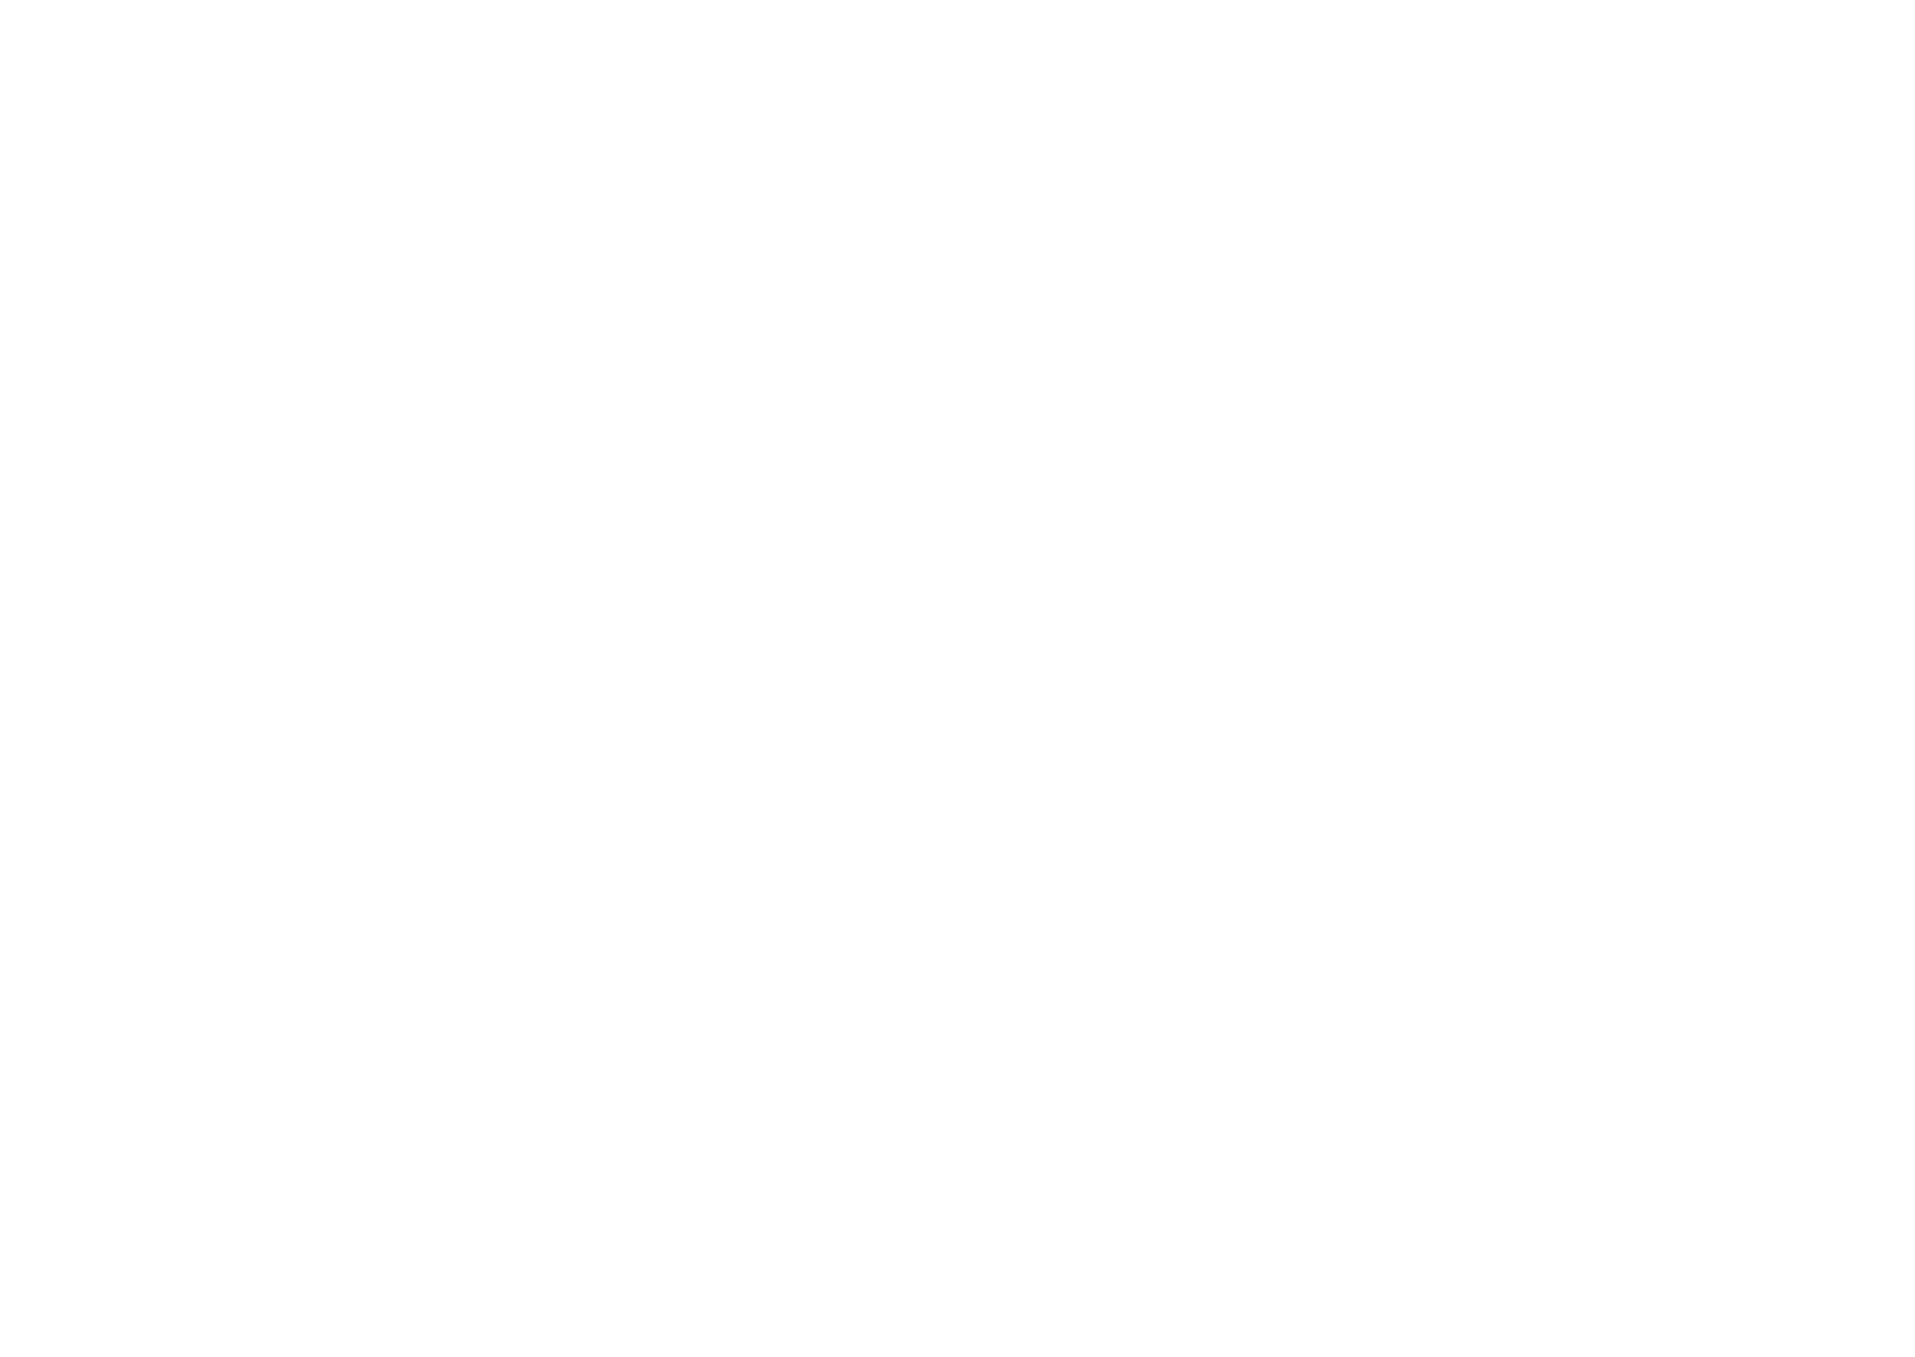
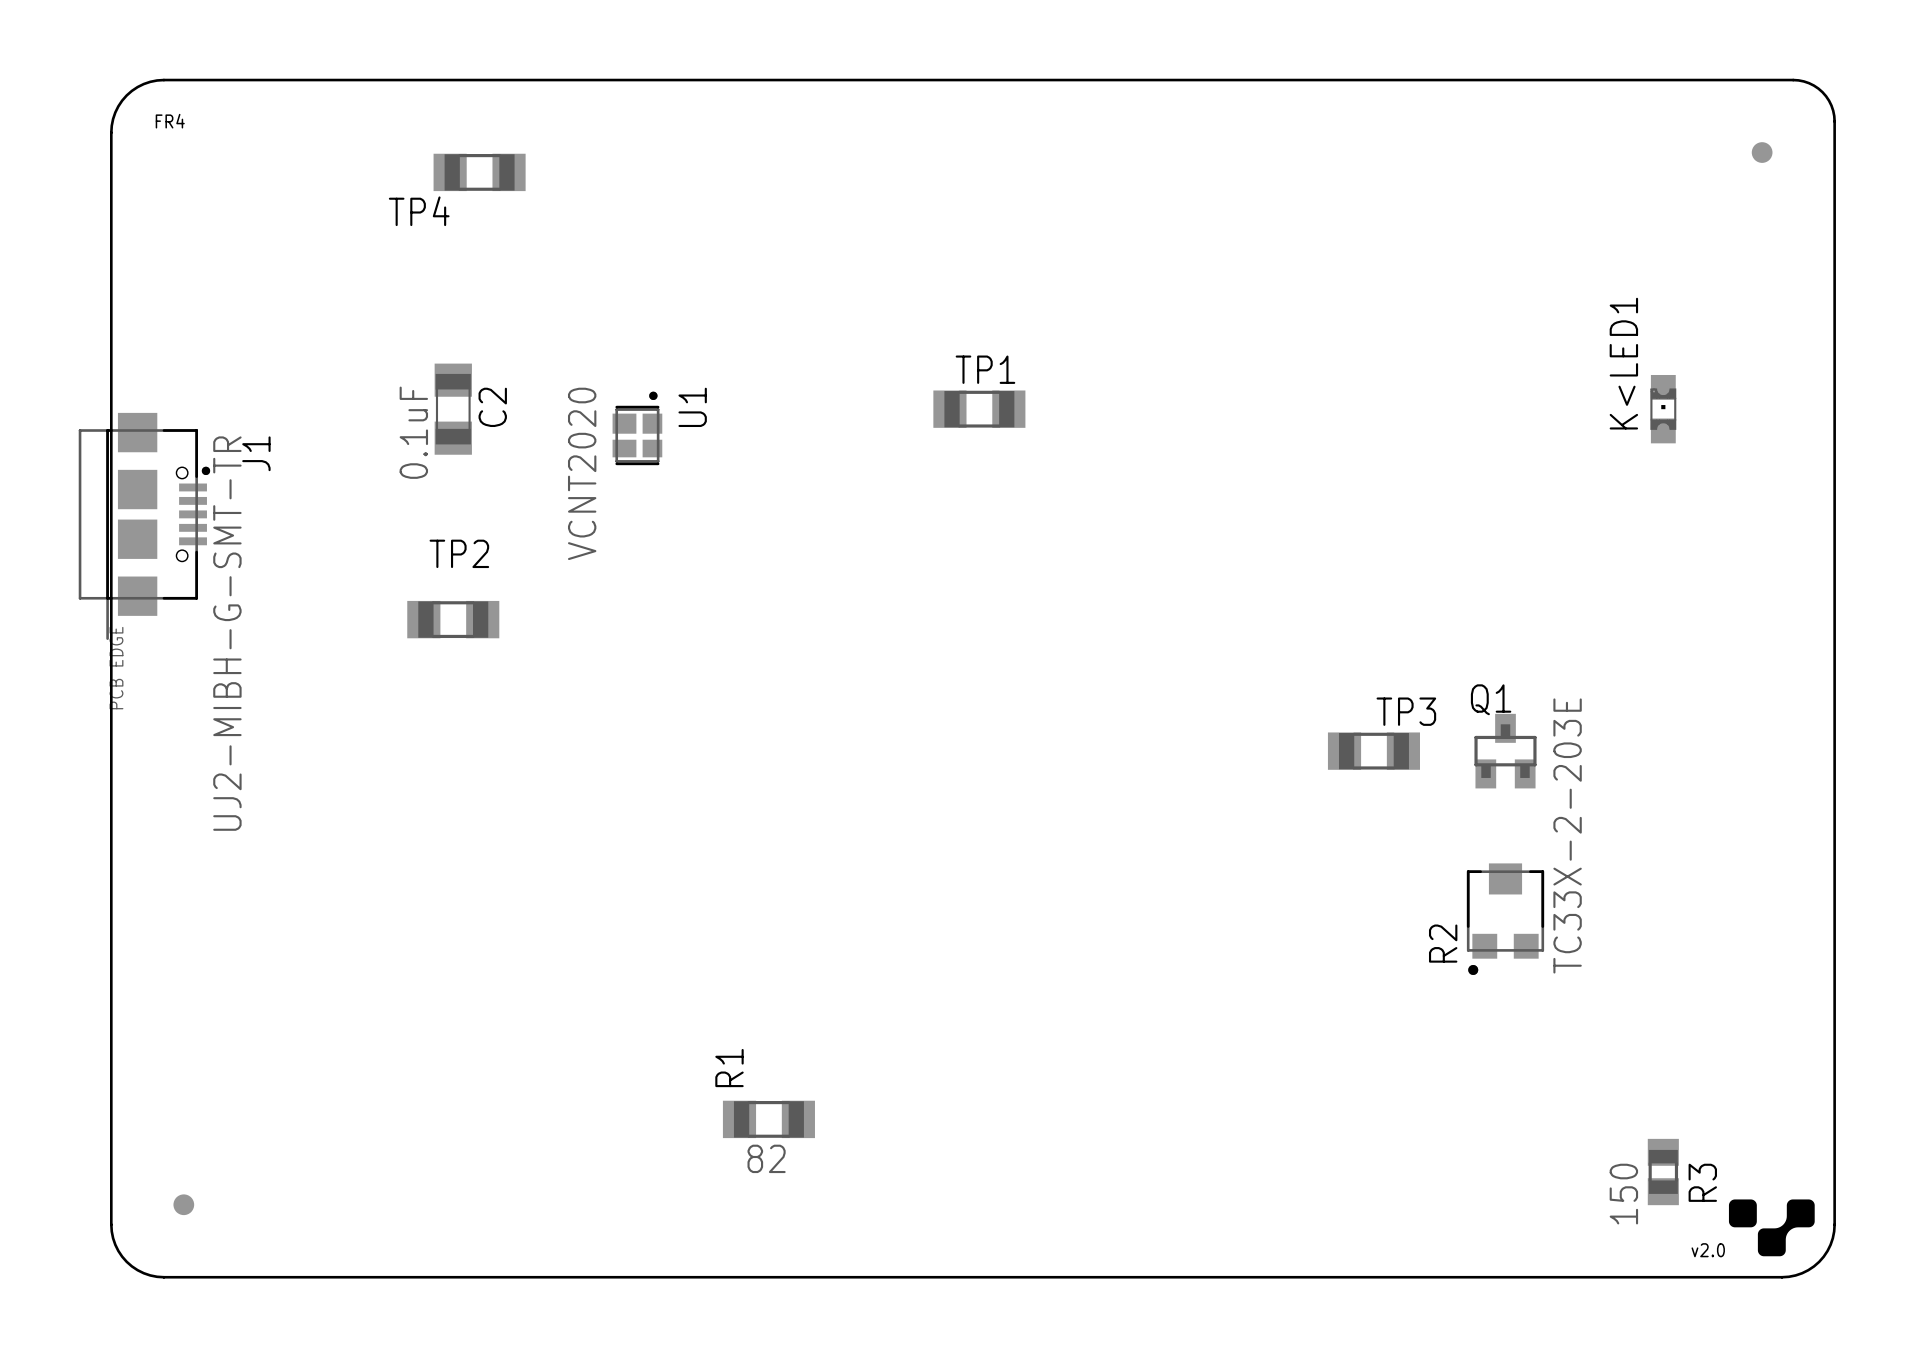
TP4: none -> (479, 172)
C2: none -> 0.1uF (453, 409)
TP1: none -> (979, 409)
K<LED1: none -> (1663, 409)
U1: none -> VCNT2020 (637, 428)
J1: none -> UJ2-MIBH-G-SMT-TR (144, 526)
TP2: none -> (453, 619)
part: none -> (972, 678)
TP3: none -> (1373, 751)
Q1: none -> (1505, 751)
R2: none -> TC33X-2-203E (1505, 919)
R1: none -> 82 (768, 1119)
R3: none -> 150 (1663, 1172)

